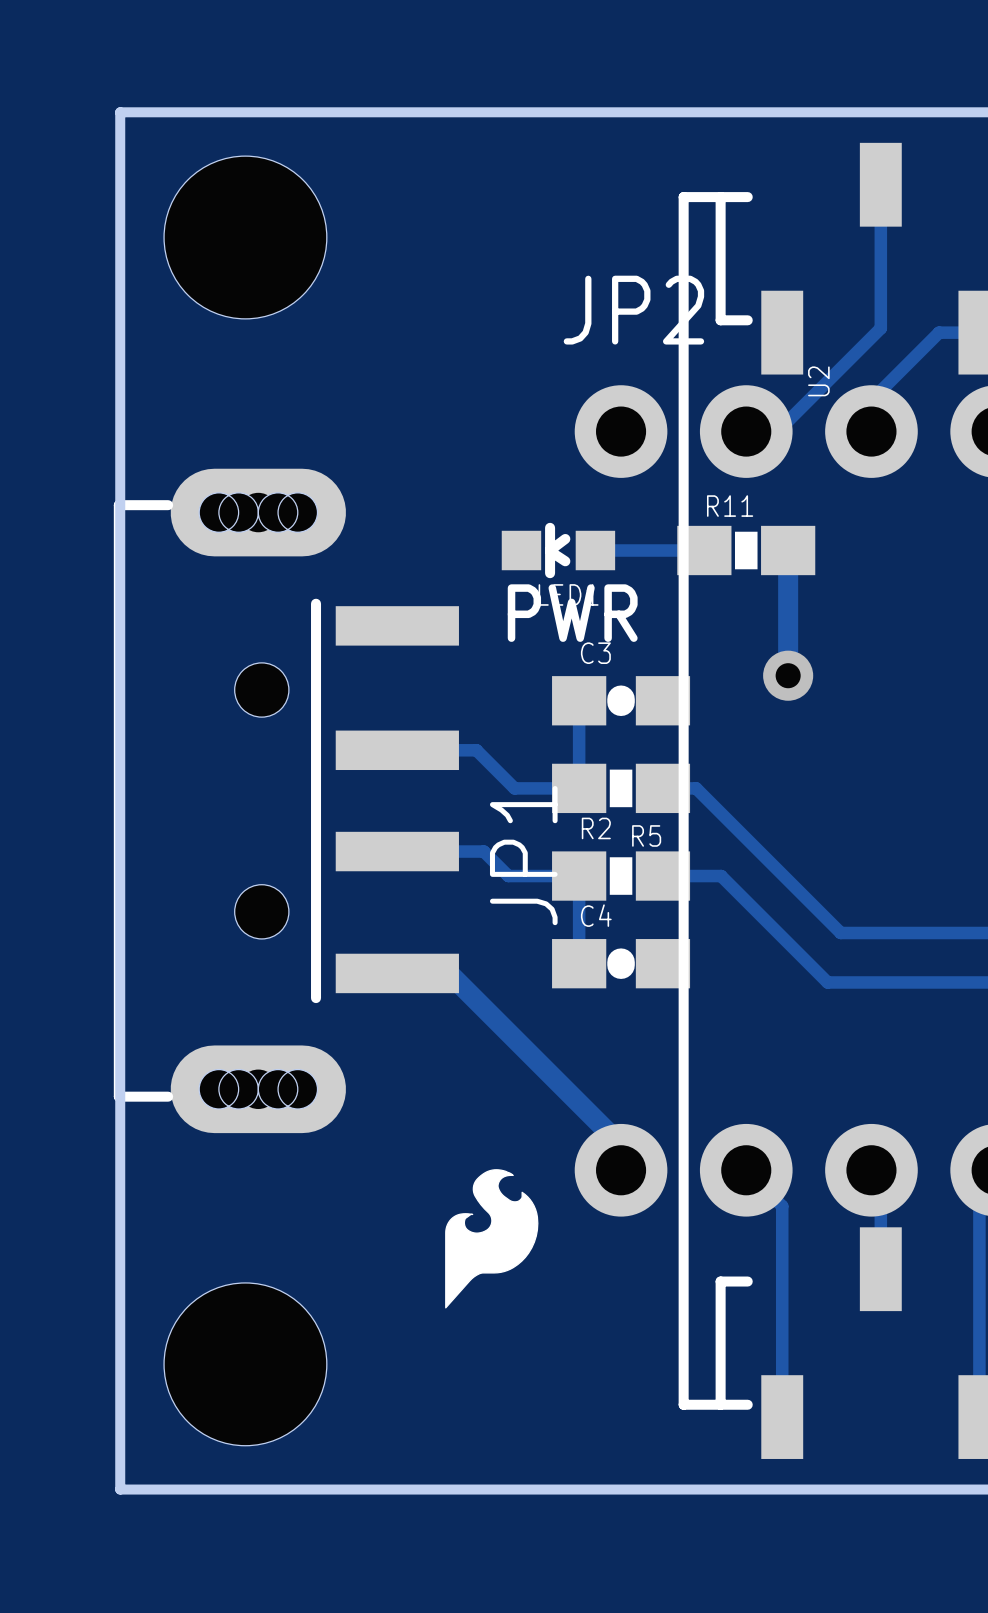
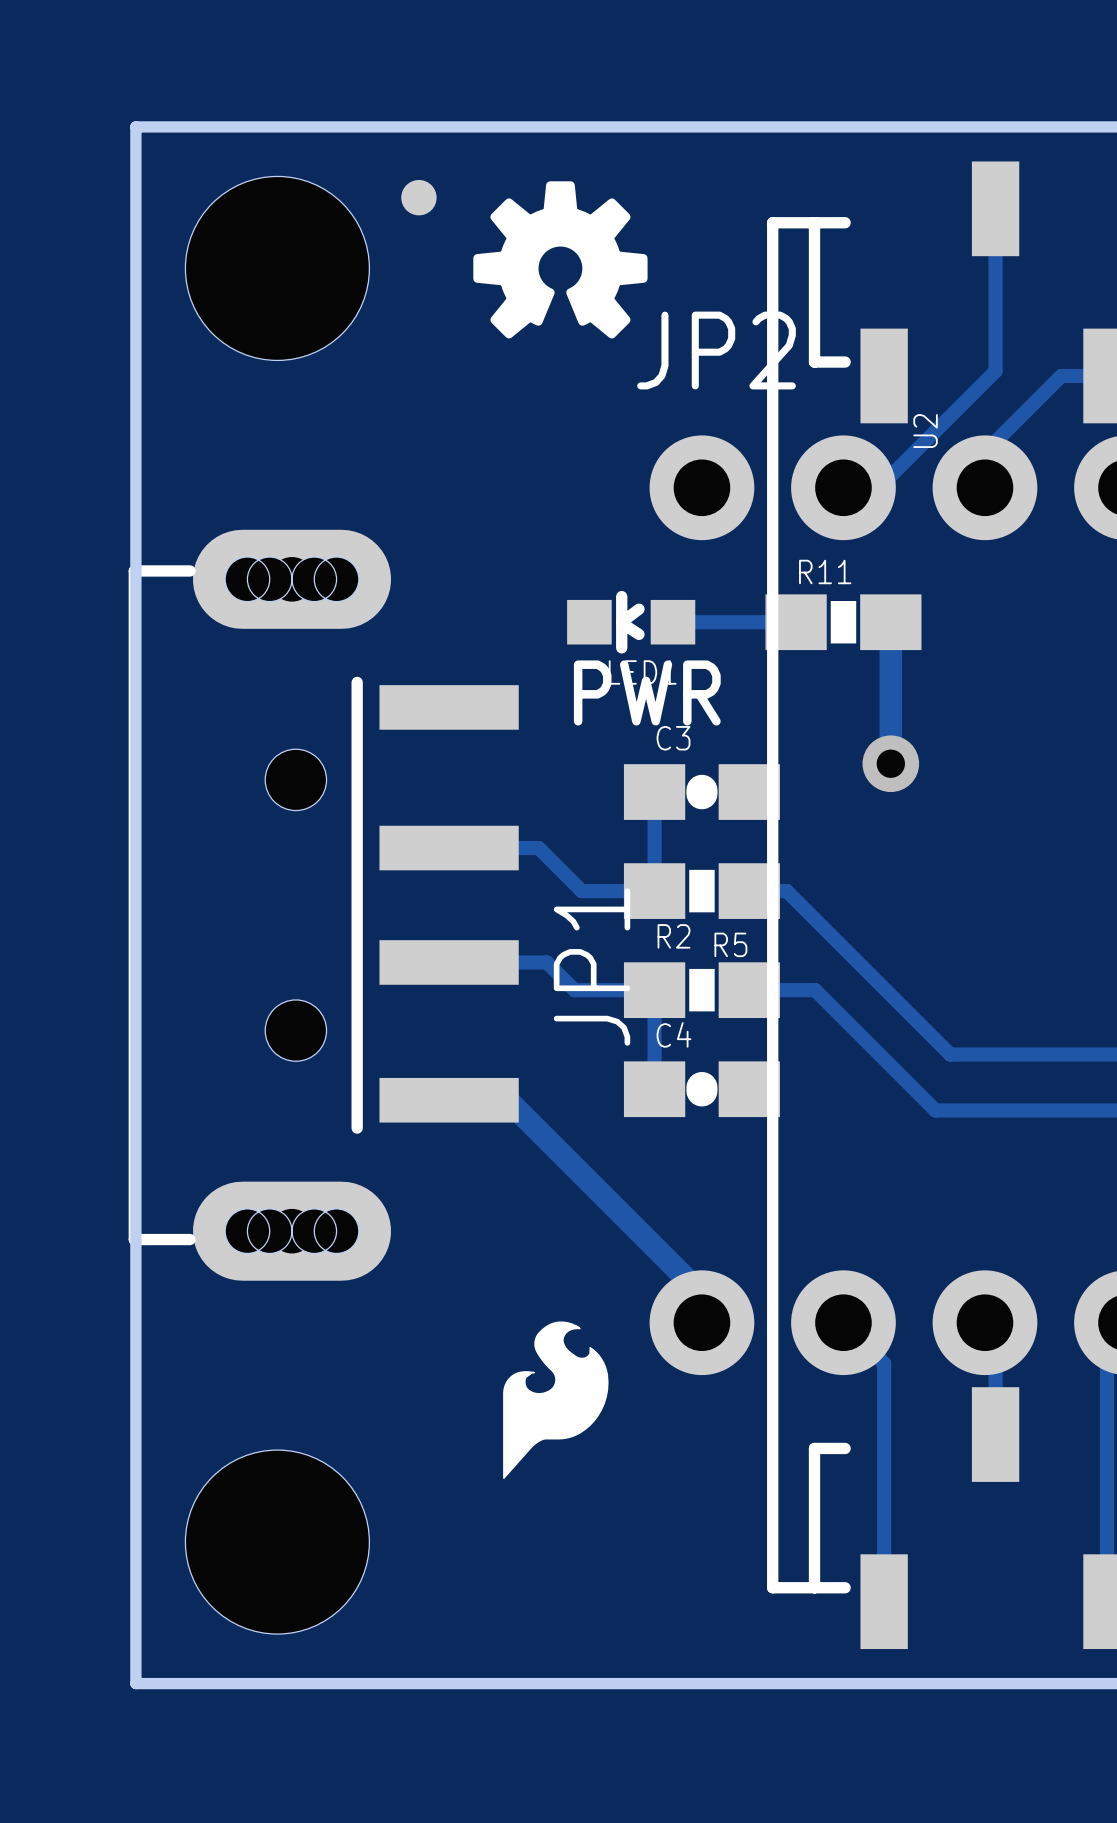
drawing: none -> [473, 181, 648, 339]
part: none -> (418, 197)

